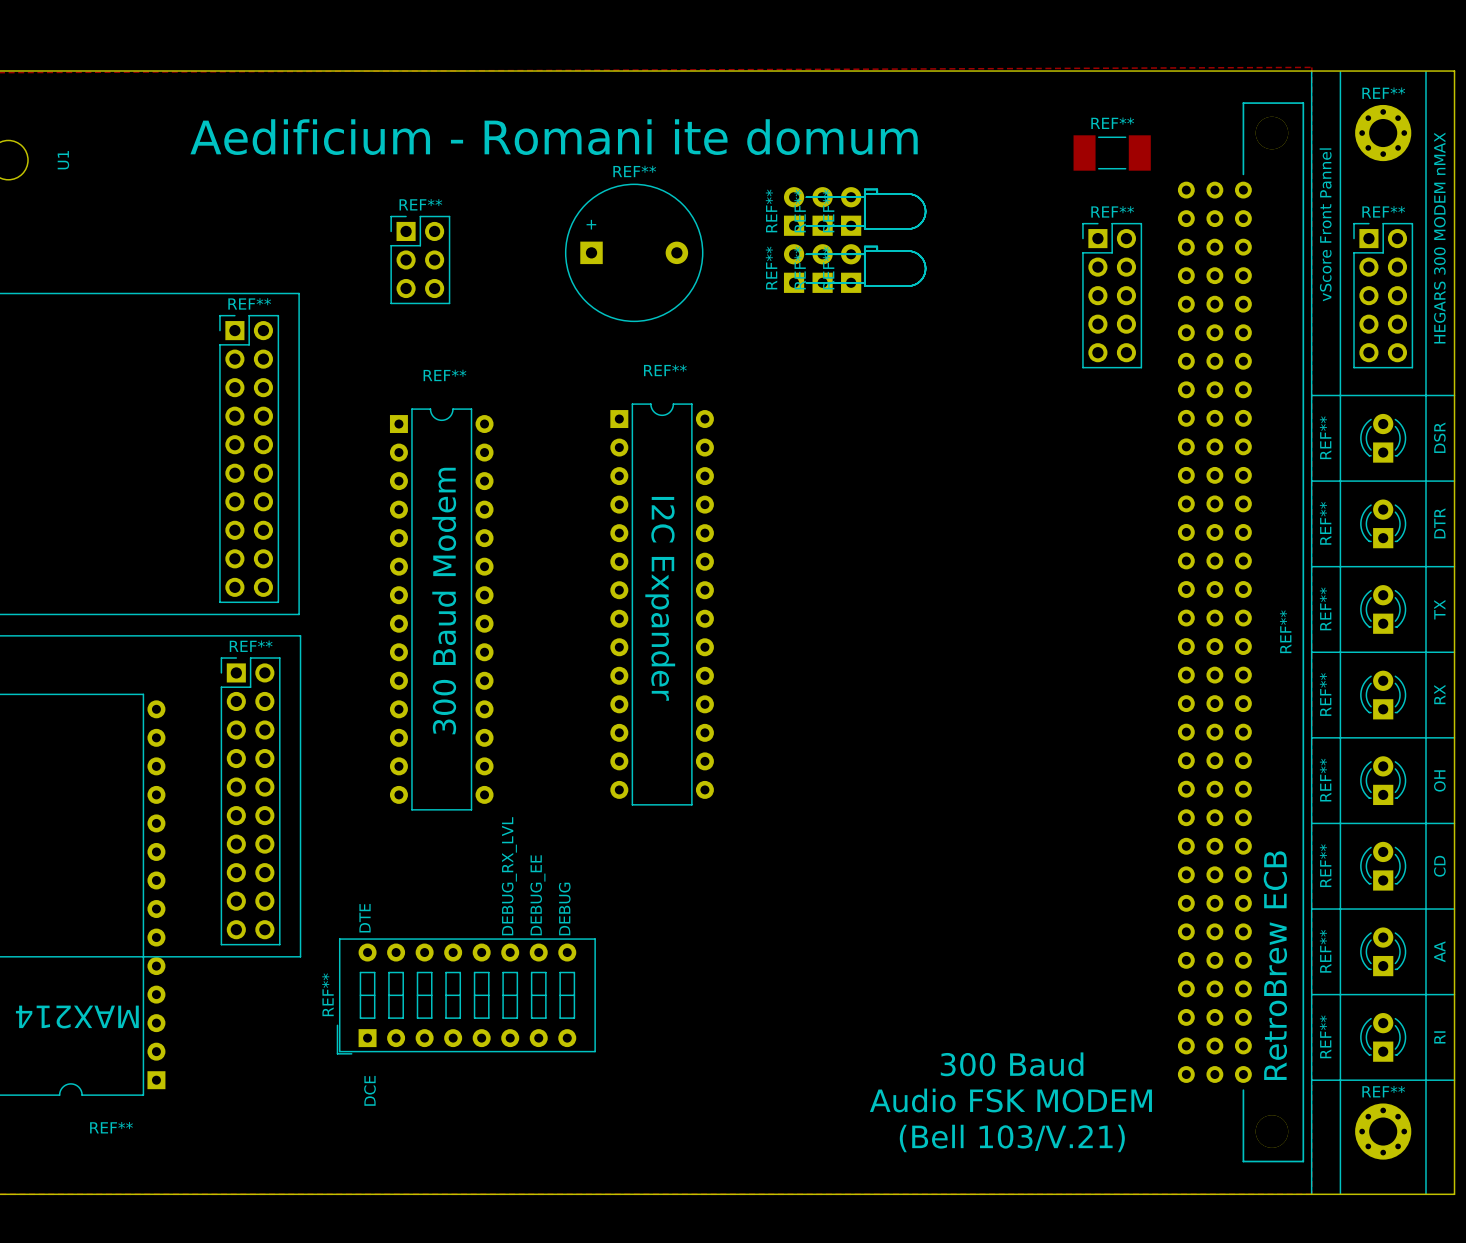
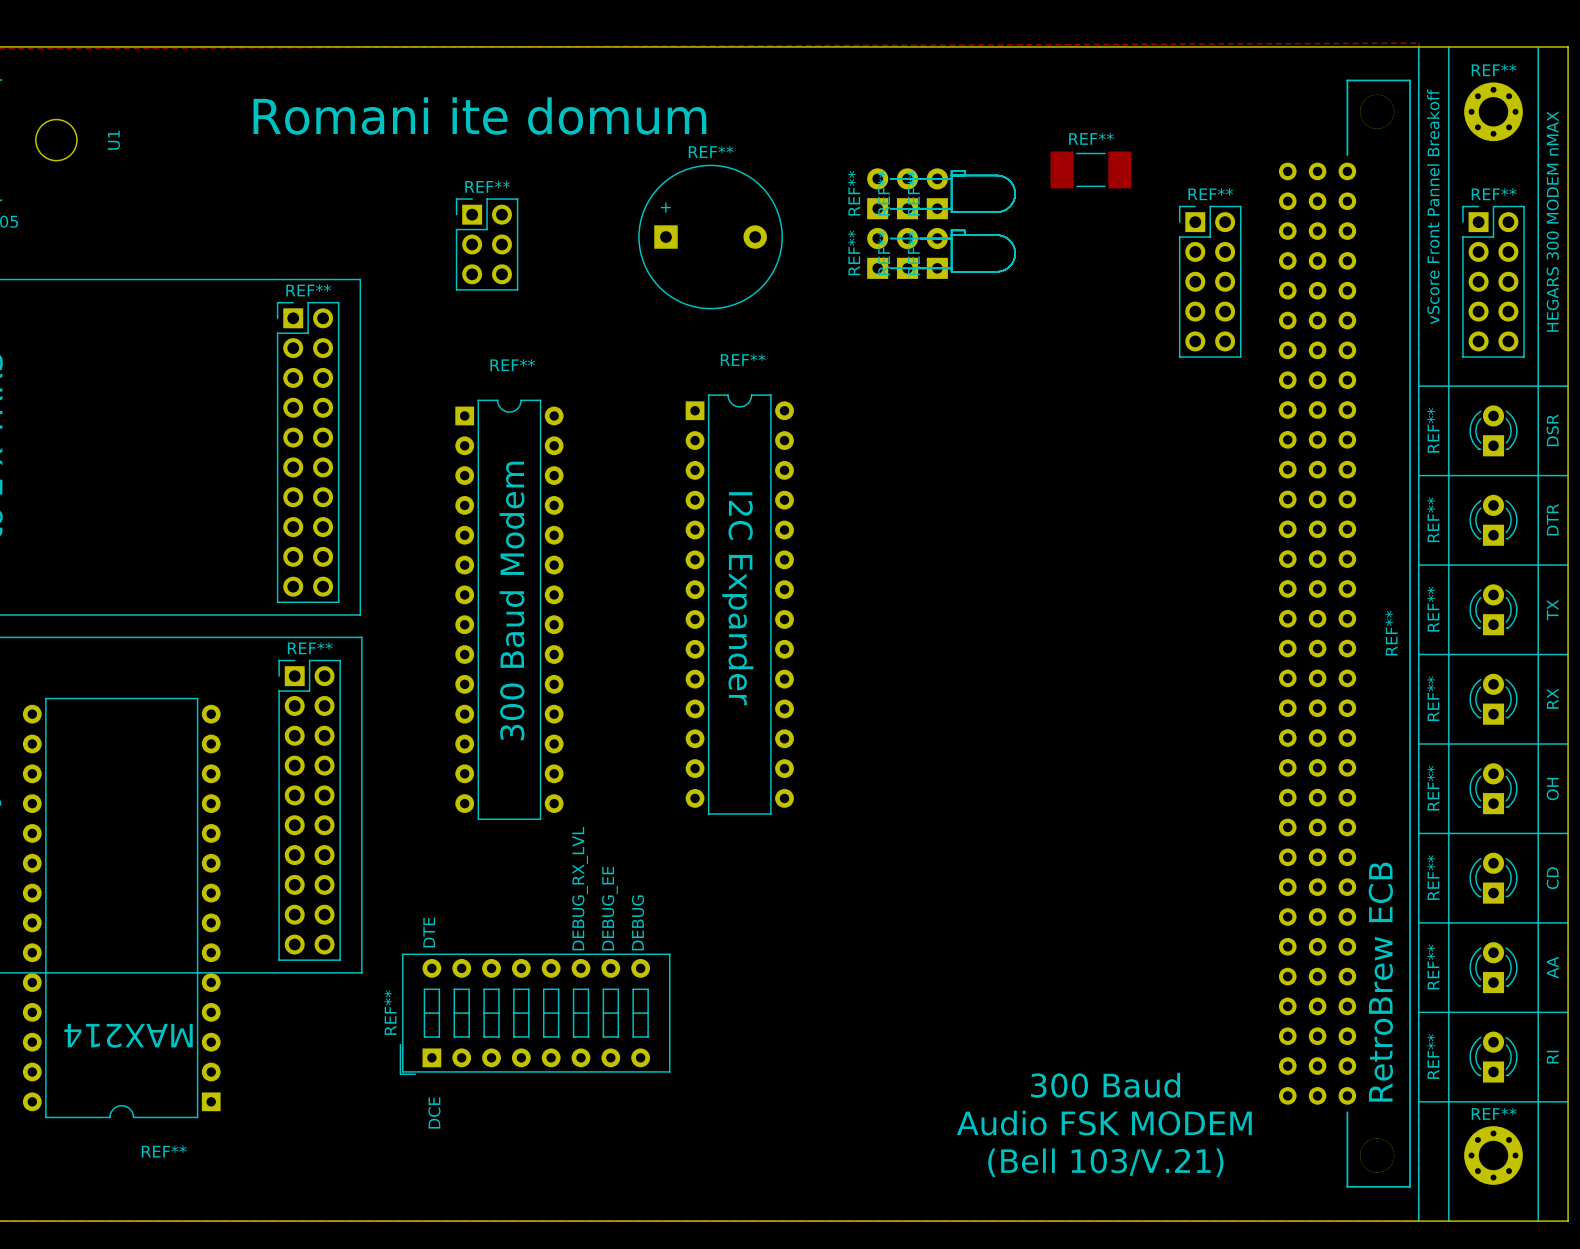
text: Aedificium - Romani ite domum (554, 137) -> Romani ite domum (479, 116)
REF** position: (1112, 153) -> (1090, 169)
text: vScore Front Pannel (1325, 224) -> vScore Front Pannel Breakoff (1433, 206)

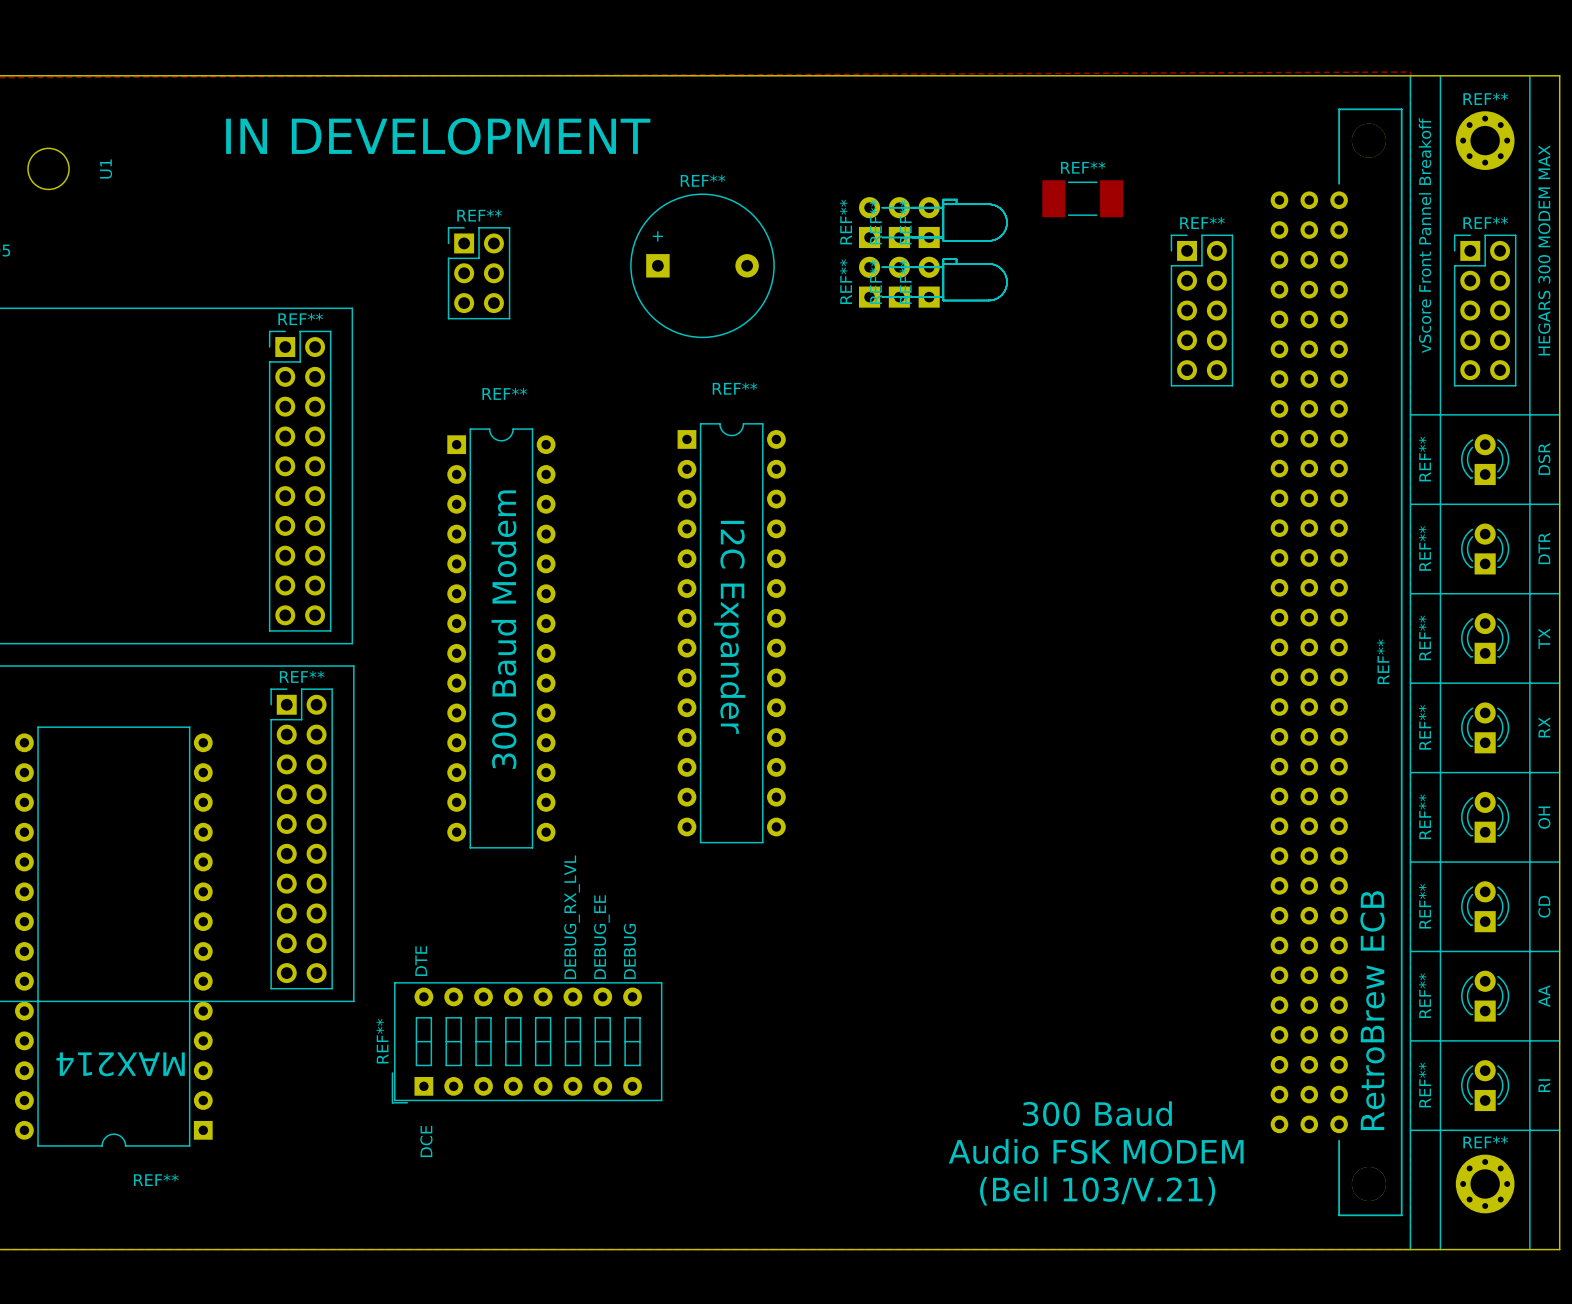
text: none -> IN DEVELOPMENT (438, 136)
text: Romani ite domum (479, 116) -> none
text: HEGARS 300 MODEM nMAX (1552, 221) -> HEGARS 300 MODEM MAX (1544, 250)

